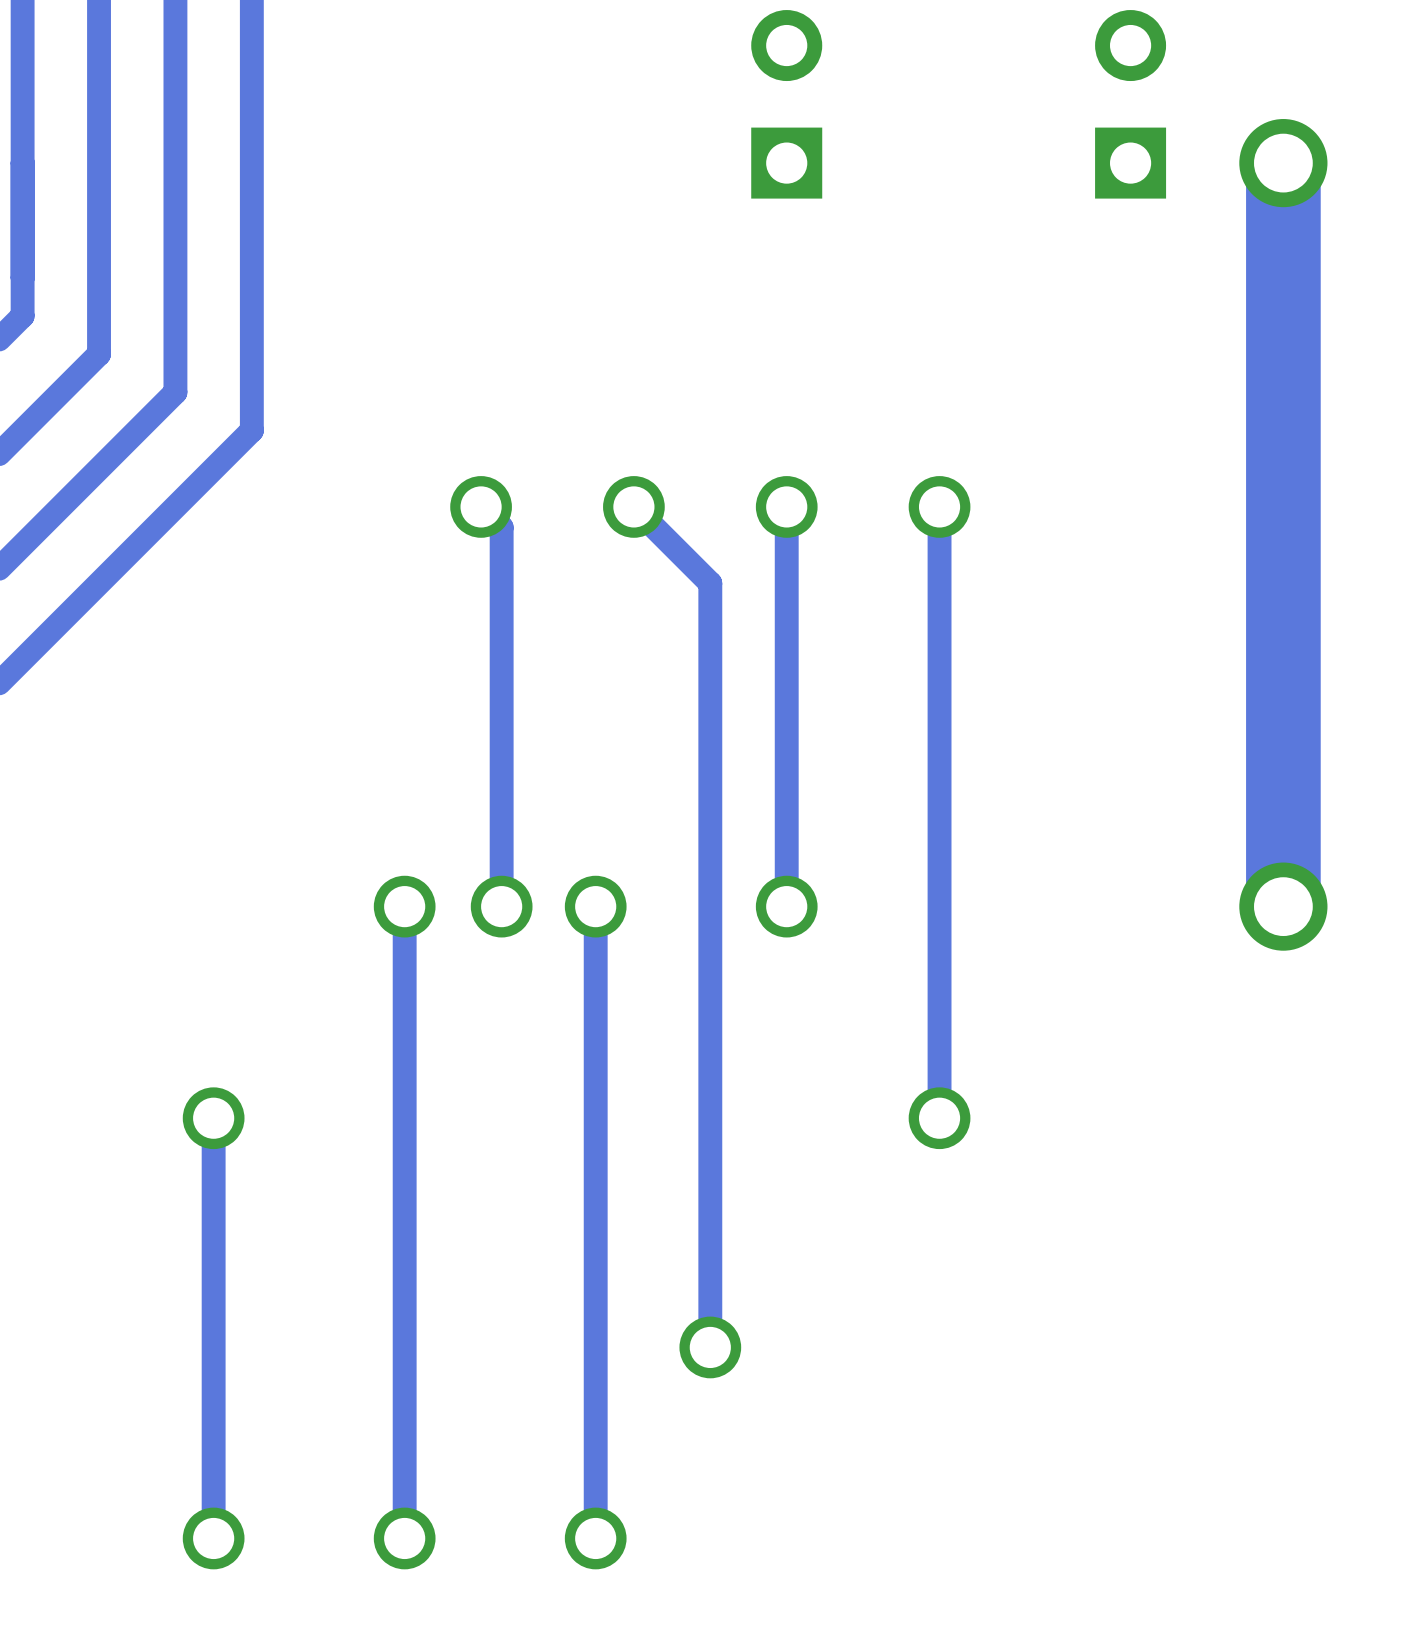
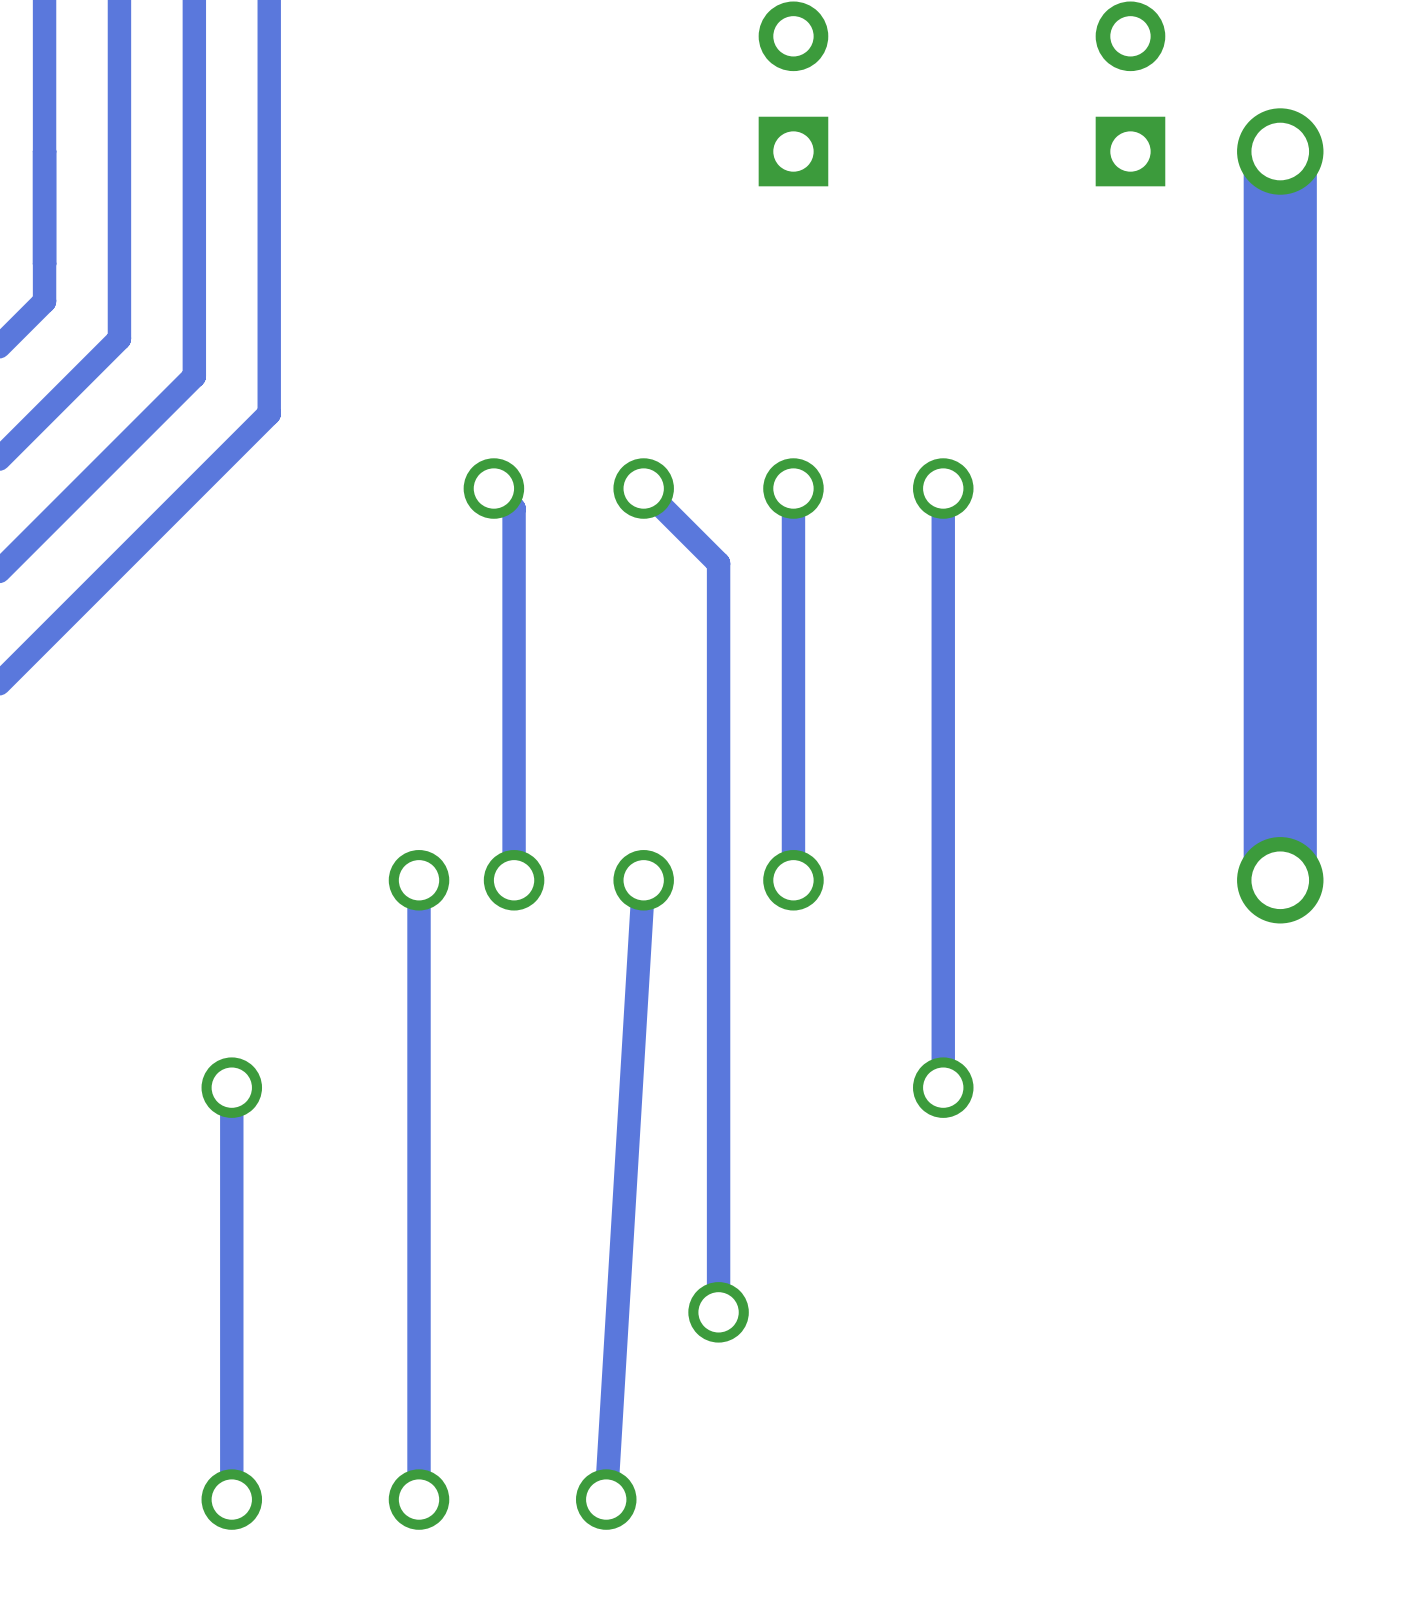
track: (595, 906) (595, 1538) -> (643, 880) (606, 1499)
via position: (595, 906) -> (643, 880)

